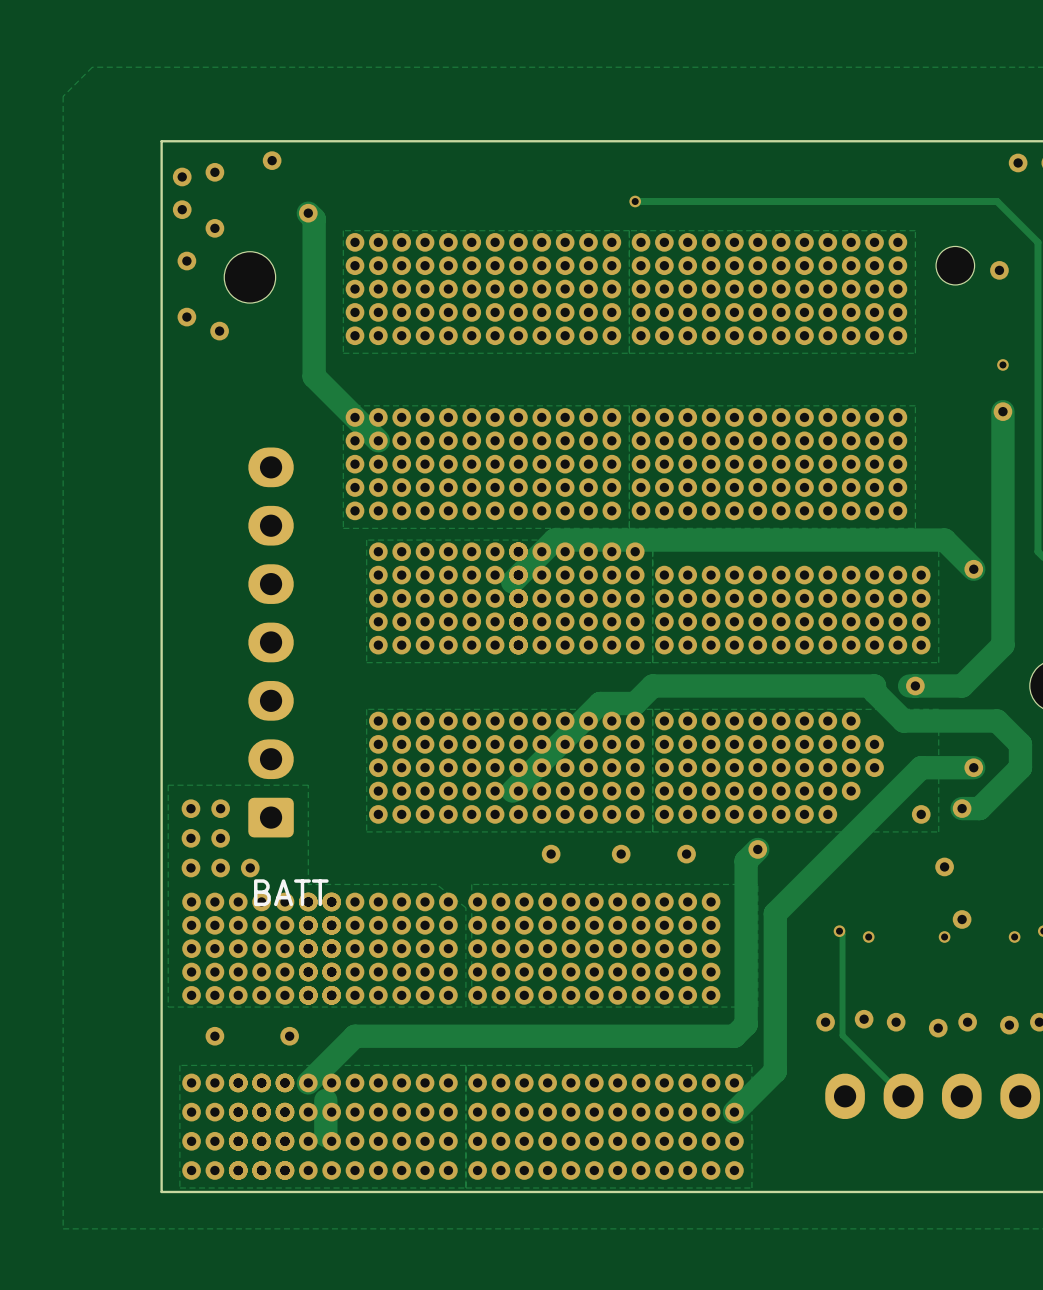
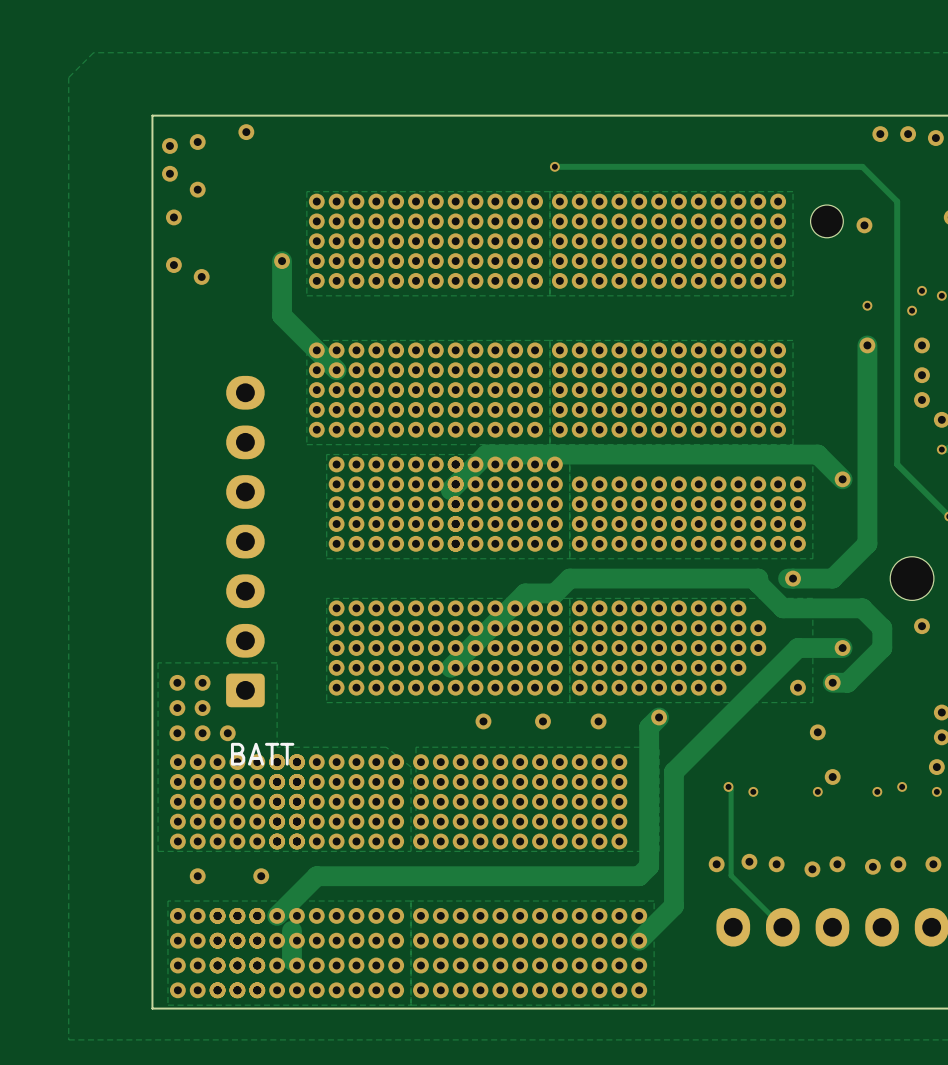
track: (308, 213) (314, 219) (314, 312) -> none
via position: (308, 213) -> (282, 261)
part: (249, 277) -> none

